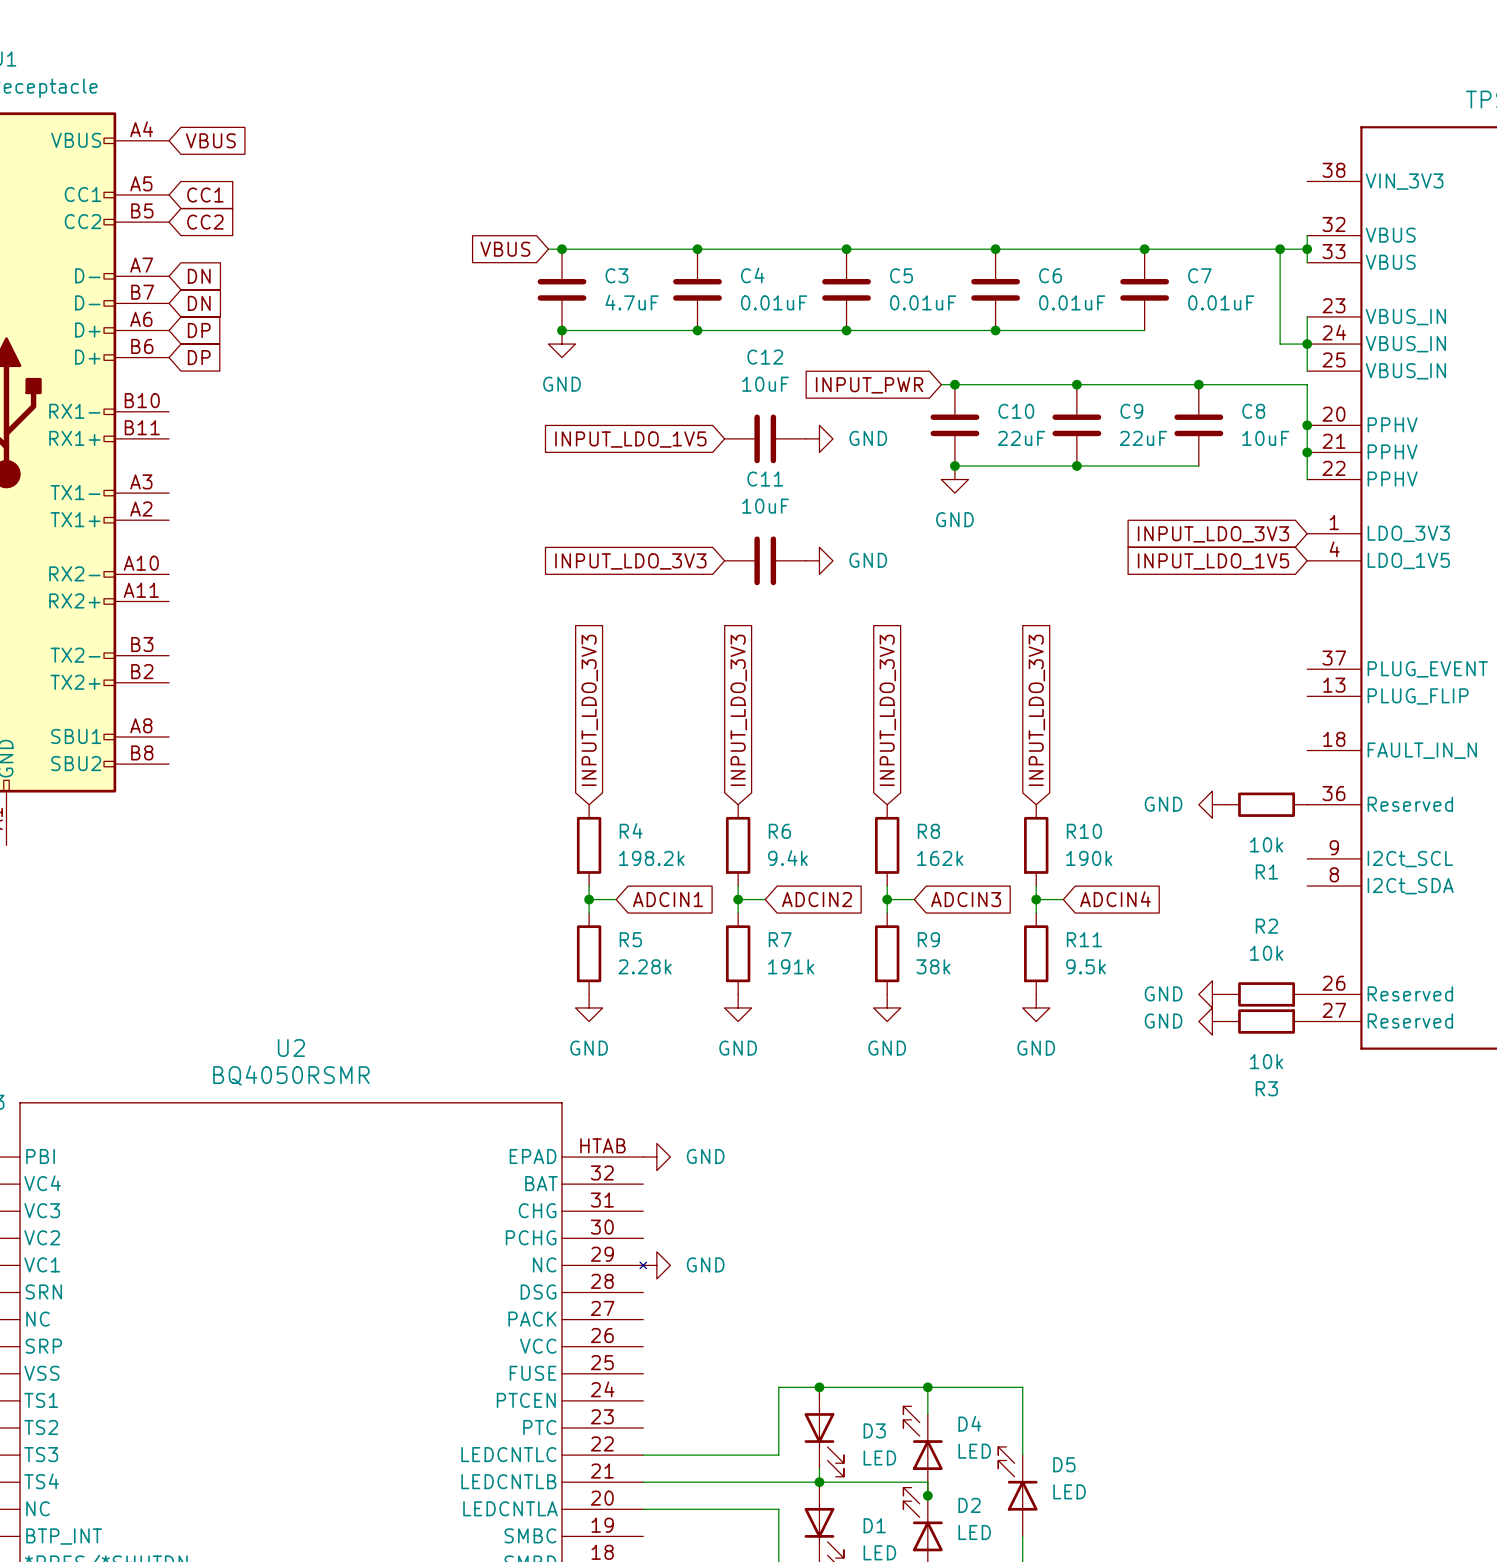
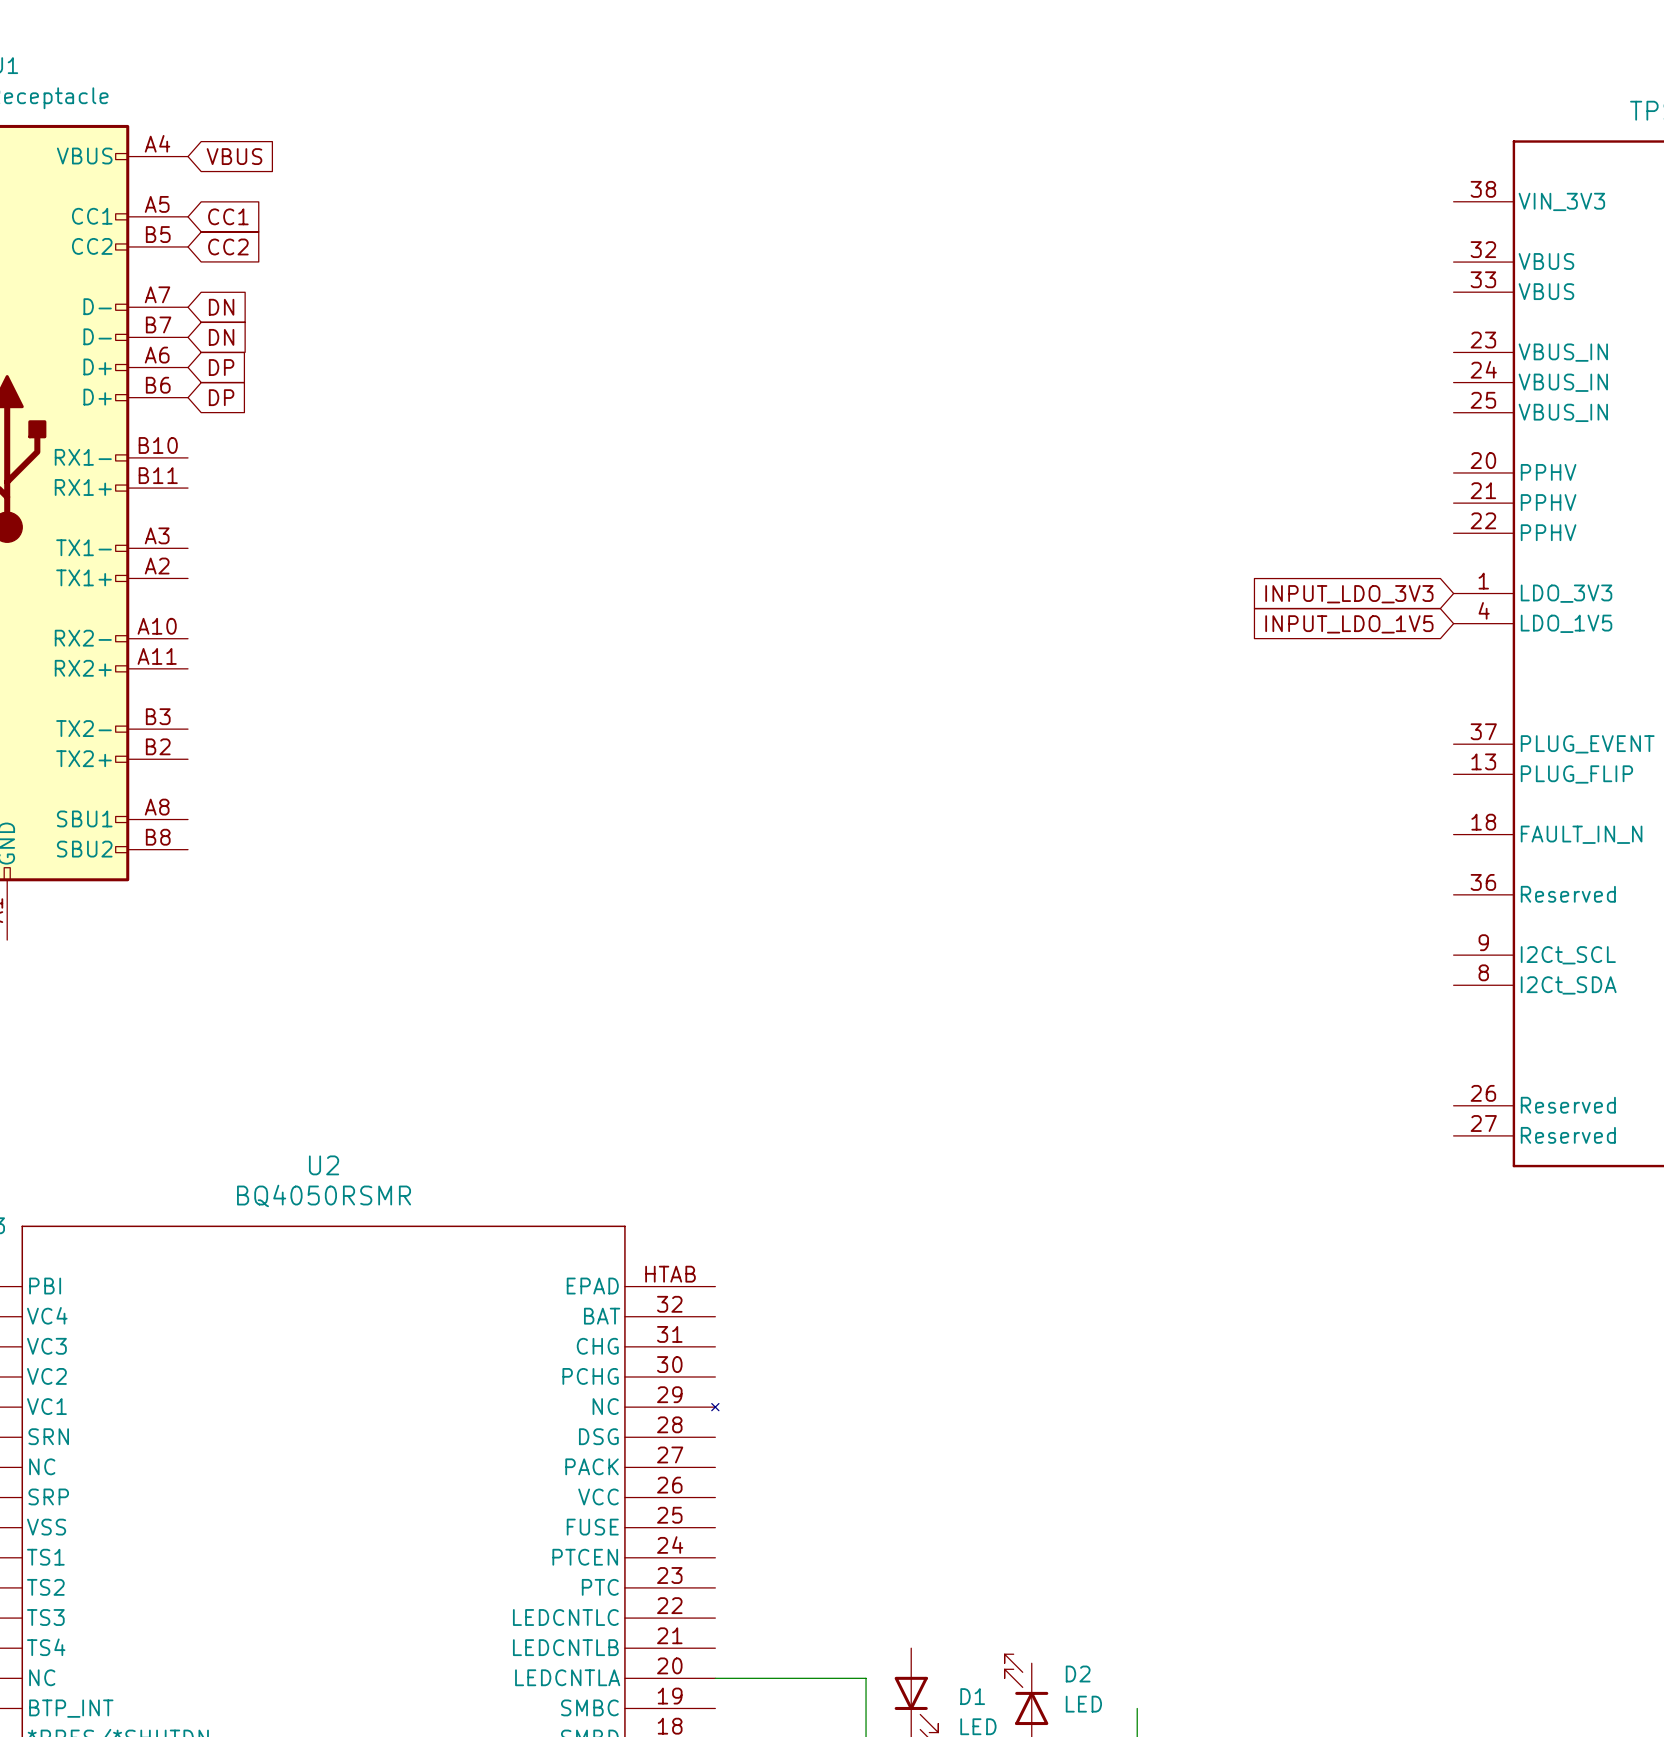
wire: (1307, 235) (1307, 262) -> none
global label: VBUS (505, 249) -> none
wire: (548, 249) (1307, 249) -> none
junction: (562, 249) -> none
junction: (697, 249) -> none
junction: (846, 249) -> none
junction: (995, 249) -> none
junction: (1144, 249) -> none
wire: (1280, 249) (1280, 344) (1307, 344) -> none
junction: (1280, 249) -> none
junction: (1307, 249) -> none
C3: 4.7uF (562, 289) -> none
C4: 0.01uF (697, 289) -> none
C5: 0.01uF (846, 289) -> none
C6: 0.01uF (995, 289) -> none
C7: 0.01uF (1144, 289) -> none
wire: (1307, 316) (1307, 371) -> none
wire: (562, 330) (1144, 330) -> none
junction: (562, 330) -> none
junction: (697, 330) -> none
junction: (846, 330) -> none
junction: (995, 330) -> none
power symbol: GND (562, 344) -> none
junction: (1307, 344) -> none
wire: (941, 384) (1307, 384) (1307, 479) -> none
junction: (954, 384) -> none
junction: (1076, 384) -> none
junction: (1198, 384) -> none
global label: INPUT_PWR (869, 385) -> none
C10: 22uF (954, 425) -> none
C9: 22uF (1076, 425) -> none
C8: 10uF (1198, 425) -> none
junction: (1307, 425) -> none
C12: 10uF (765, 438) -> none
power symbol: GND (819, 438) -> none
global label: INPUT_LDO_1V5 (630, 439) -> none
junction: (1307, 452) -> none
wire: (954, 465) (1198, 465) -> none
junction: (954, 465) -> none
junction: (1076, 465) -> none
power symbol: GND (954, 479) -> none
C11: 10uF (765, 560) -> none
power symbol: GND (819, 560) -> none
global label: INPUT_LDO_3V3 (630, 561) -> none
global label: INPUT_LDO_3V3 (589, 710) -> none
global label: INPUT_LDO_3V3 (738, 710) -> none
global label: INPUT_LDO_3V3 (887, 710) -> none
global label: INPUT_LDO_3V3 (1036, 710) -> none
power symbol: GND (1212, 804) -> none
R1: 10k (1266, 804) -> none
R4: 198.2k (589, 845) -> none
R6: 9.4k (738, 845) -> none
R8: 162k (887, 845) -> none
R10: 190k (1036, 845) -> none
wire: (589, 886) (589, 913) -> none
wire: (738, 886) (738, 913) -> none
wire: (887, 886) (887, 913) -> none
wire: (1036, 886) (1036, 913) -> none
wire: (589, 899) (616, 899) -> none
junction: (589, 899) -> none
global label: ADCIN1 (668, 899) -> none
wire: (738, 899) (765, 899) -> none
junction: (738, 899) -> none
global label: ADCIN2 (817, 899) -> none
wire: (887, 899) (914, 899) -> none
junction: (887, 899) -> none
global label: ADCIN3 (966, 899) -> none
wire: (1036, 899) (1063, 899) -> none
junction: (1036, 899) -> none
global label: ADCIN4 (1115, 899) -> none
R5: 2.28k (589, 953) -> none
R7: 191k (738, 953) -> none
R9: 38k (887, 953) -> none
R11: 9.5k (1036, 953) -> none
power symbol: GND (1212, 994) -> none
R2: 10k (1266, 994) -> none
power symbol: GND (589, 1007) -> none
power symbol: GND (738, 1007) -> none
power symbol: GND (887, 1007) -> none
power symbol: GND (1036, 1007) -> none
power symbol: GND (1212, 1021) -> none
R3: 10k (1266, 1021) -> none
power symbol: GND (656, 1157) -> none
power symbol: GND (656, 1265) -> none
junction: (819, 1387) -> none
wire: (927, 1387) (927, 1414) -> none
junction: (927, 1387) -> none
D3: LED (824, 1432) -> none
D4: LED (923, 1451) -> none
wire: (643, 1455) (778, 1455) (778, 1387) (1022, 1387) (1022, 1455) -> none
wire: (819, 1468) (819, 1482) -> none
wire: (643, 1482) (927, 1482) (927, 1495) -> none
junction: (819, 1482) -> none
D5: LED (1017, 1491) -> none
junction: (927, 1495) -> none

